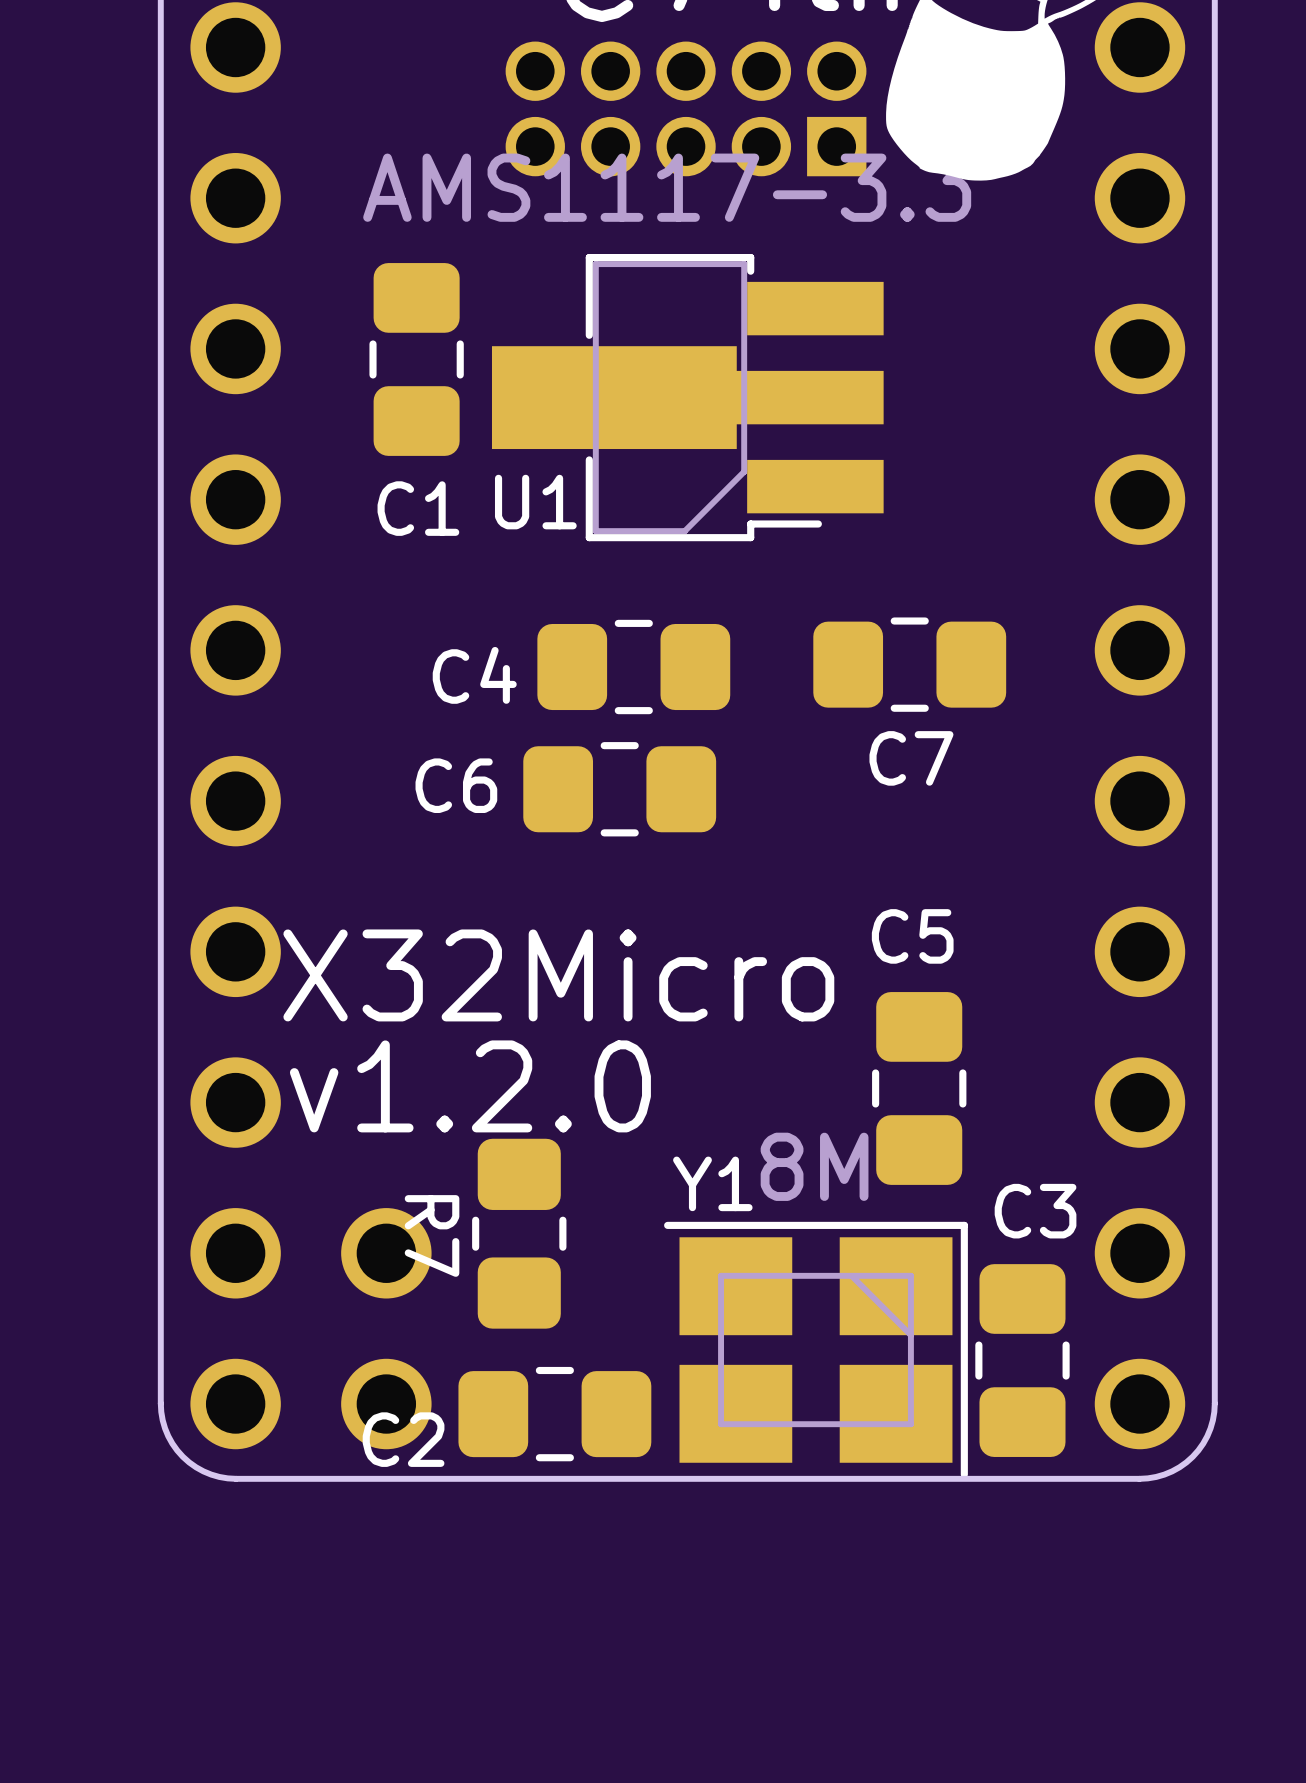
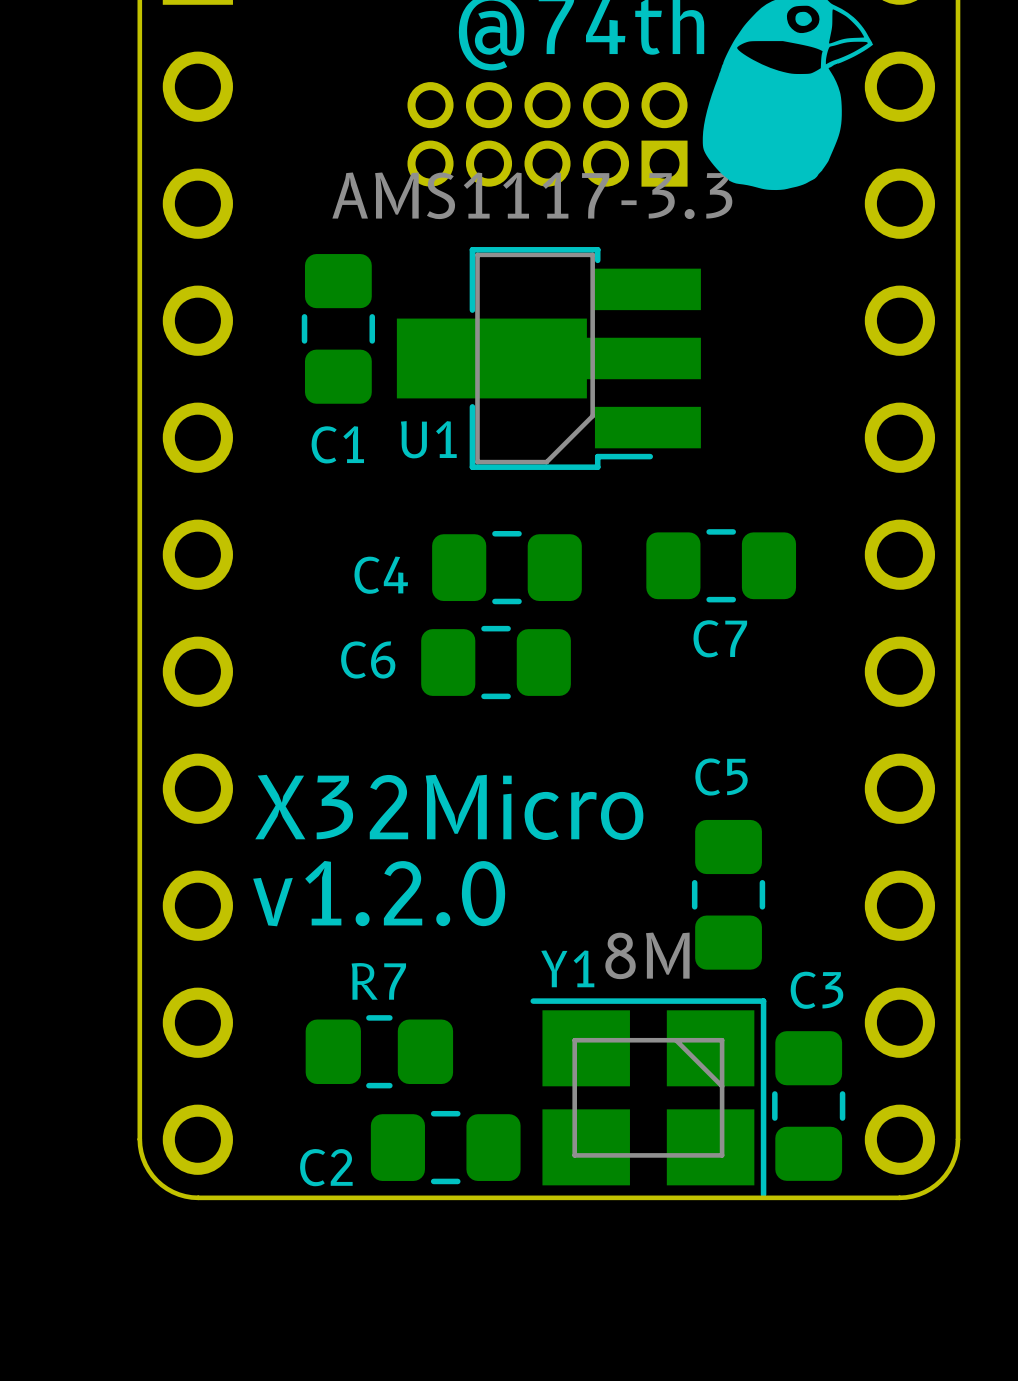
R7 rotation: 0° (519, 1233) -> 90° clockwise (379, 1051)
part: (386, 1253) -> none
part: (386, 1404) -> none

